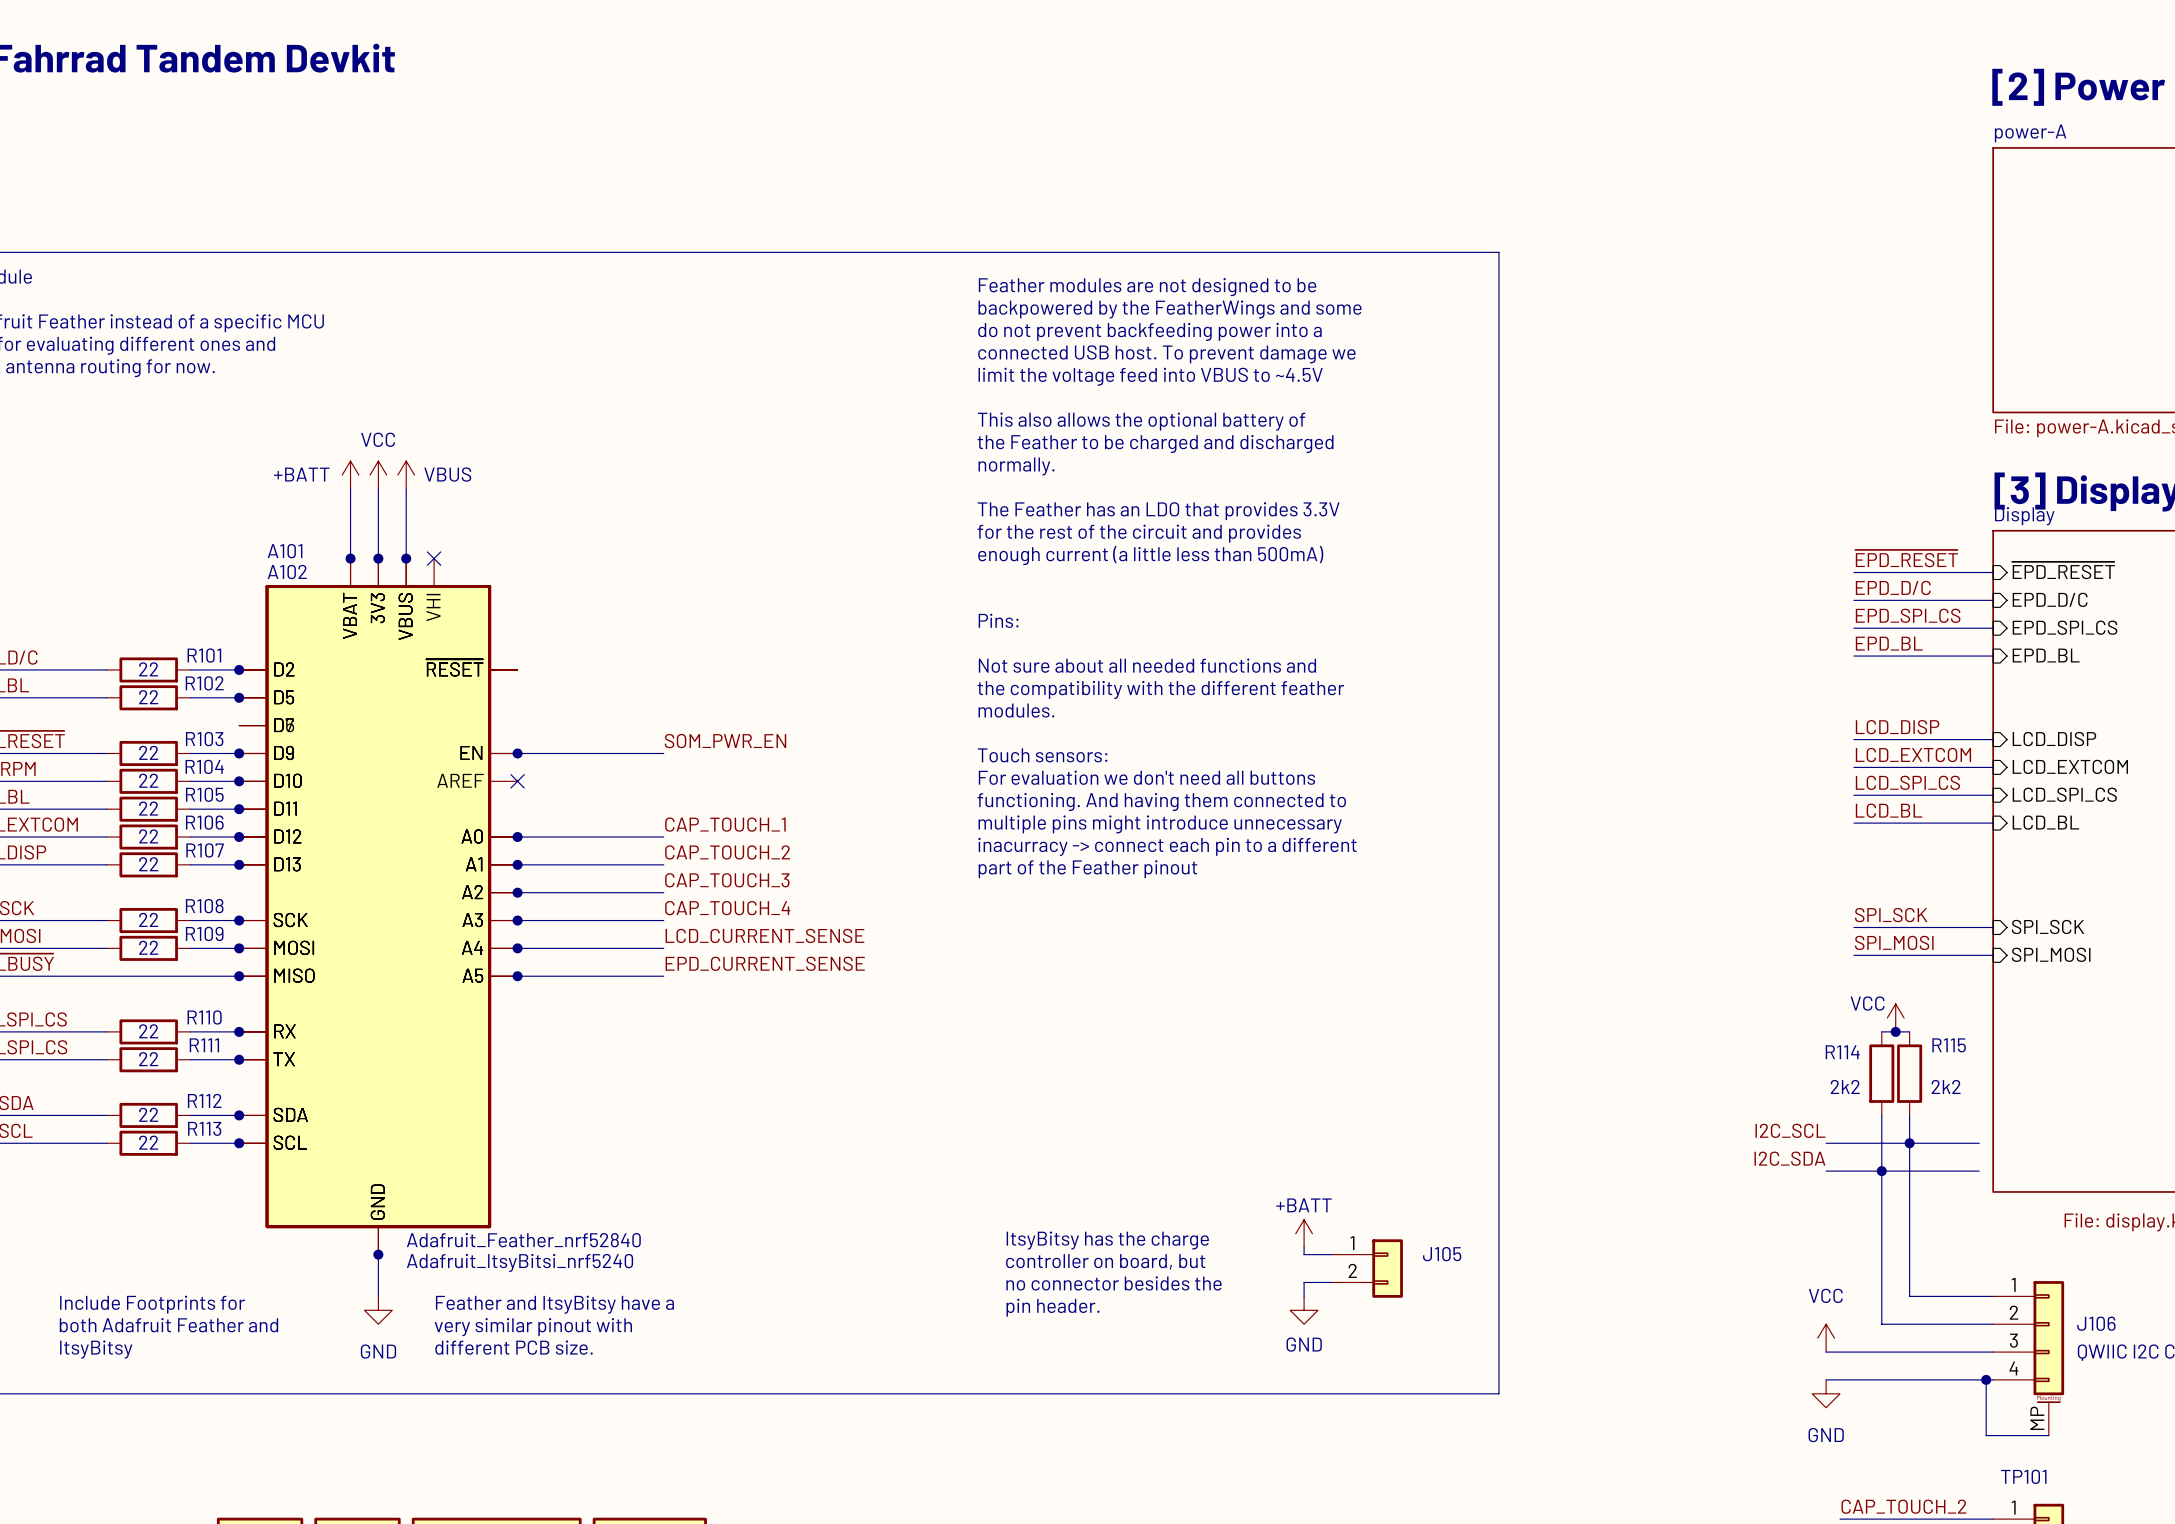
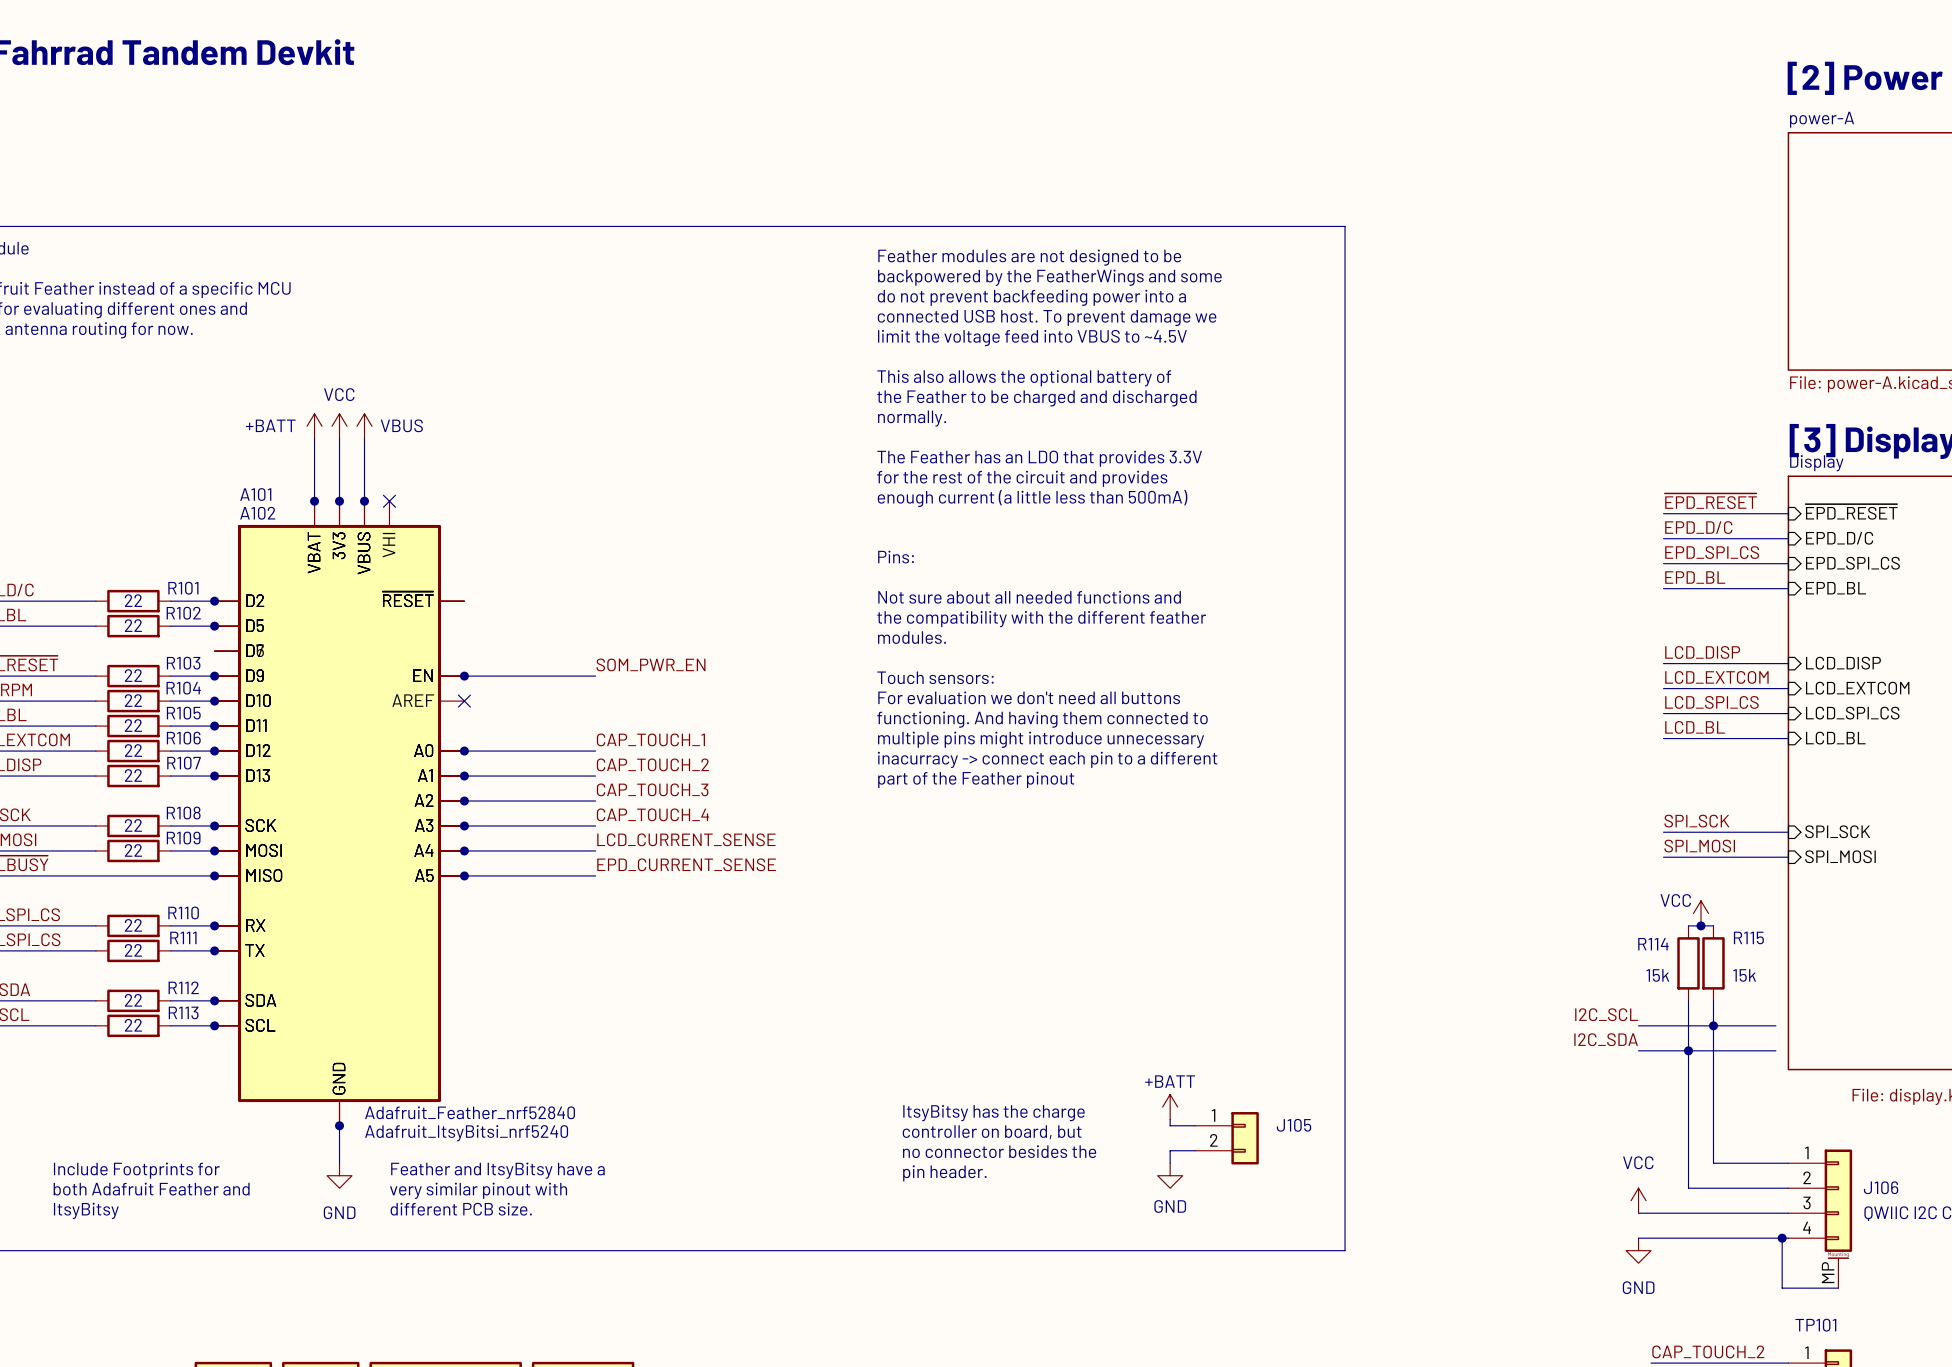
R114 value: 2k2 (1845, 1086) -> 15k (1657, 975)
R115 value: 2k2 (1946, 1086) -> 15k (1744, 975)

